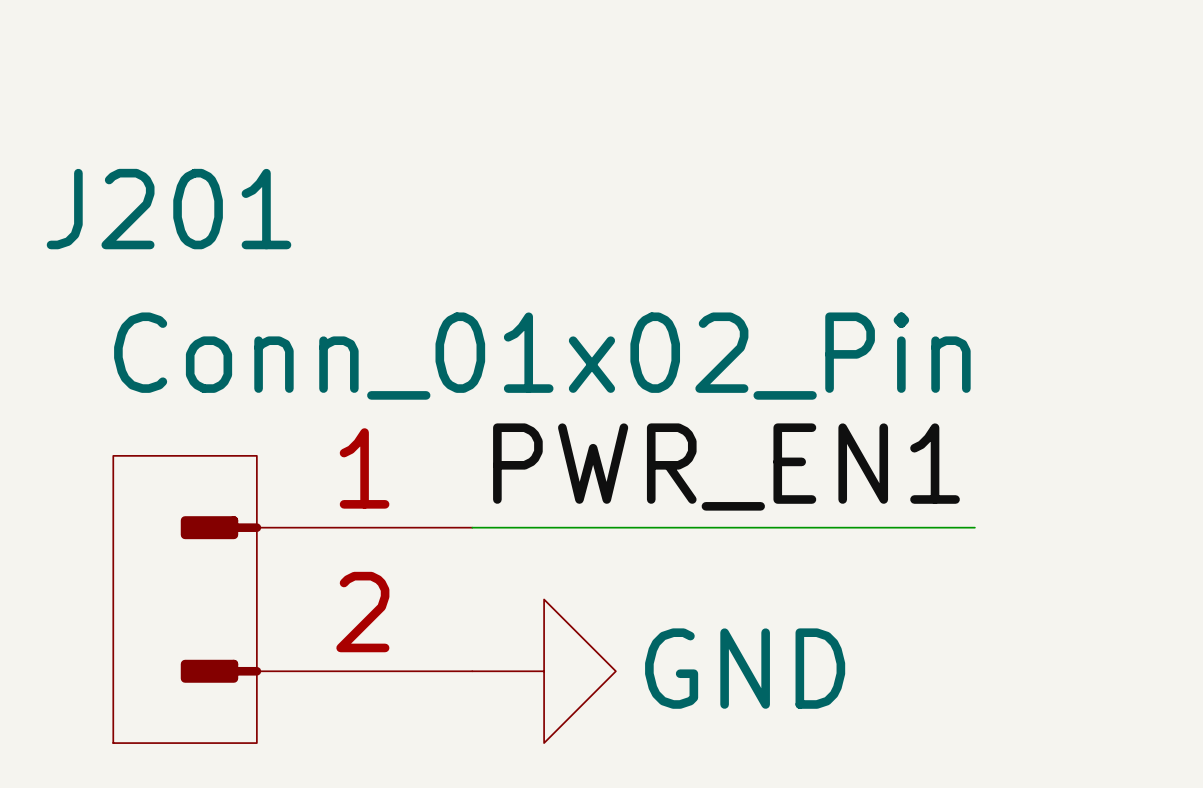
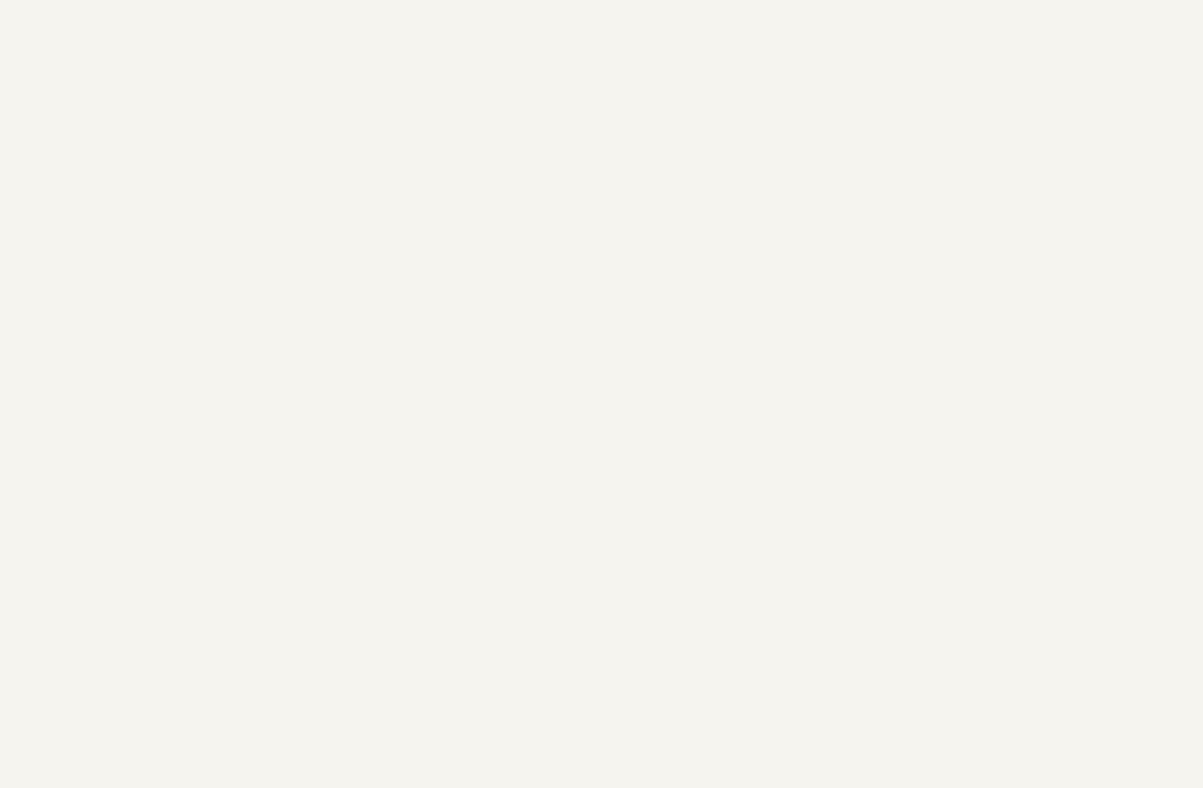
label: PWR_EN1 (726, 467) -> none
wire: (472, 527) (974, 527) -> none
J201: Conn_01x02_Pin (292, 599) -> none
power symbol: GND (544, 671) -> none

